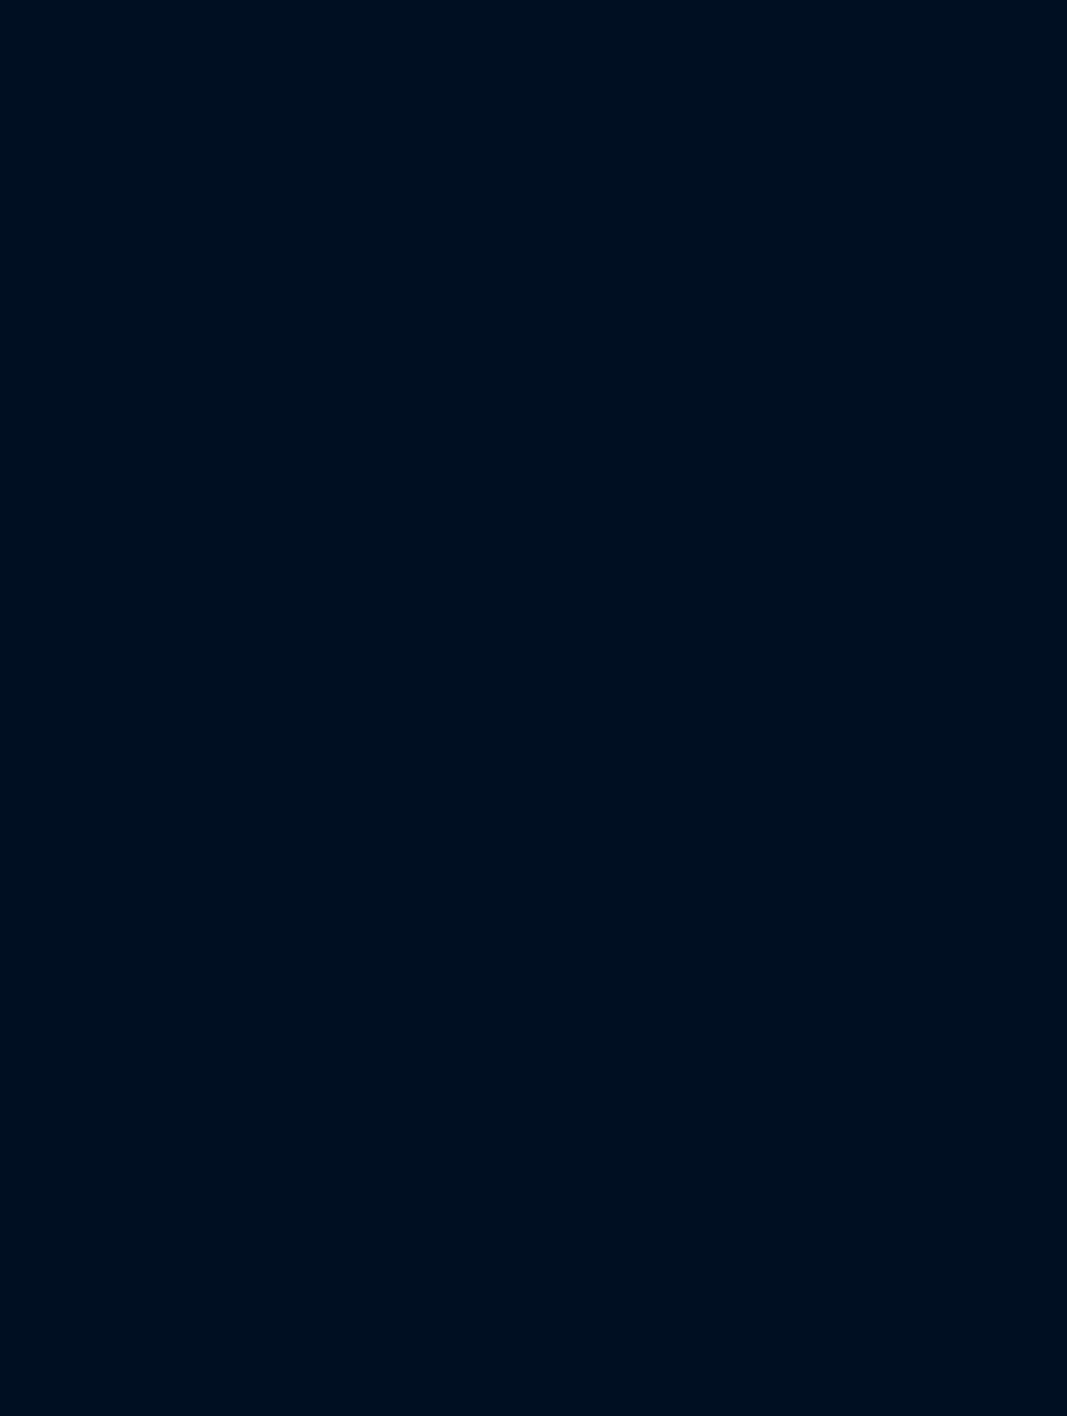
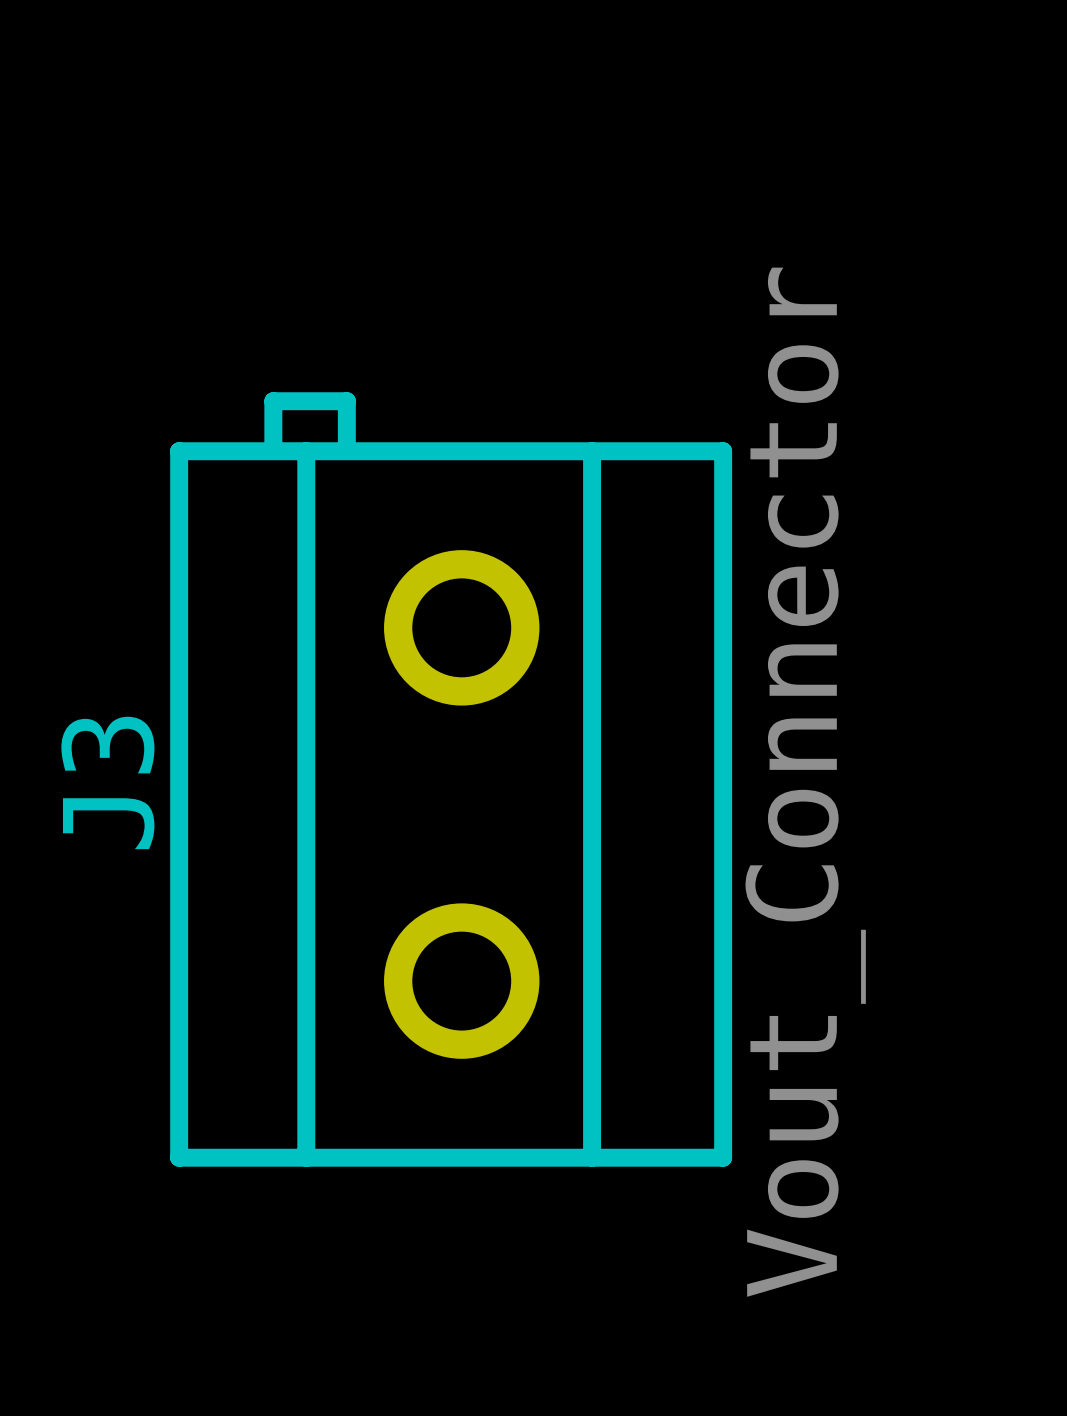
J3: none -> Vout_Connector (451, 779)

